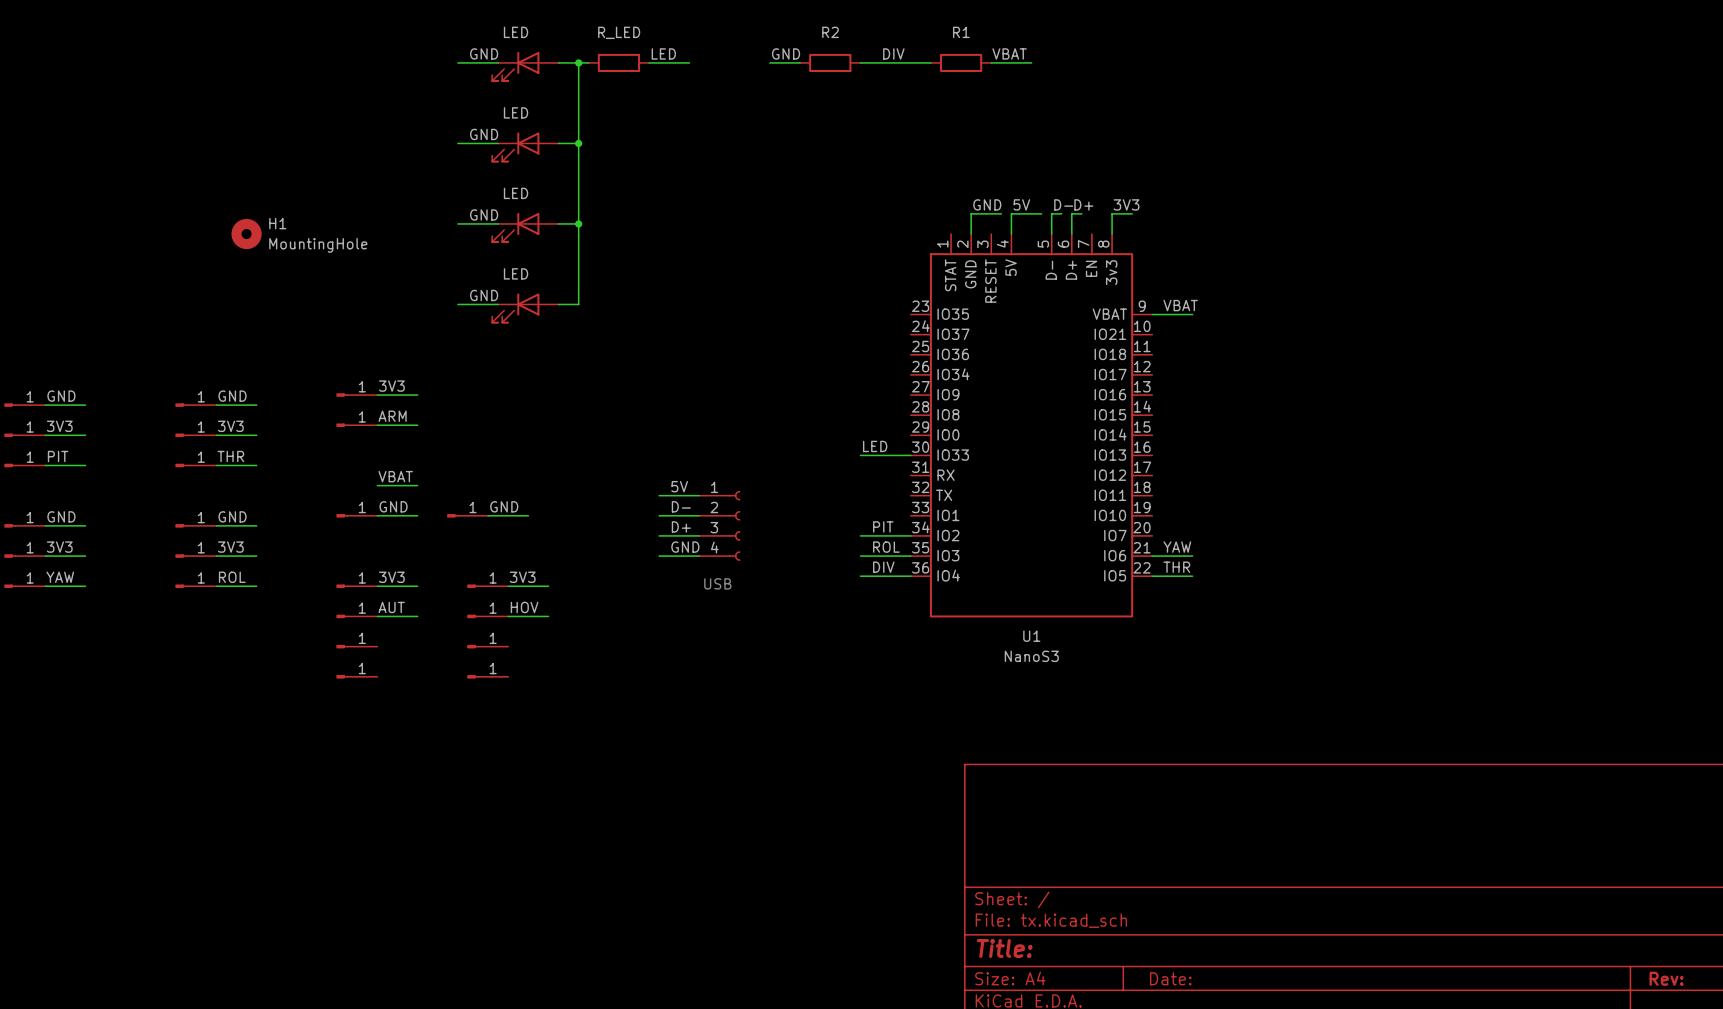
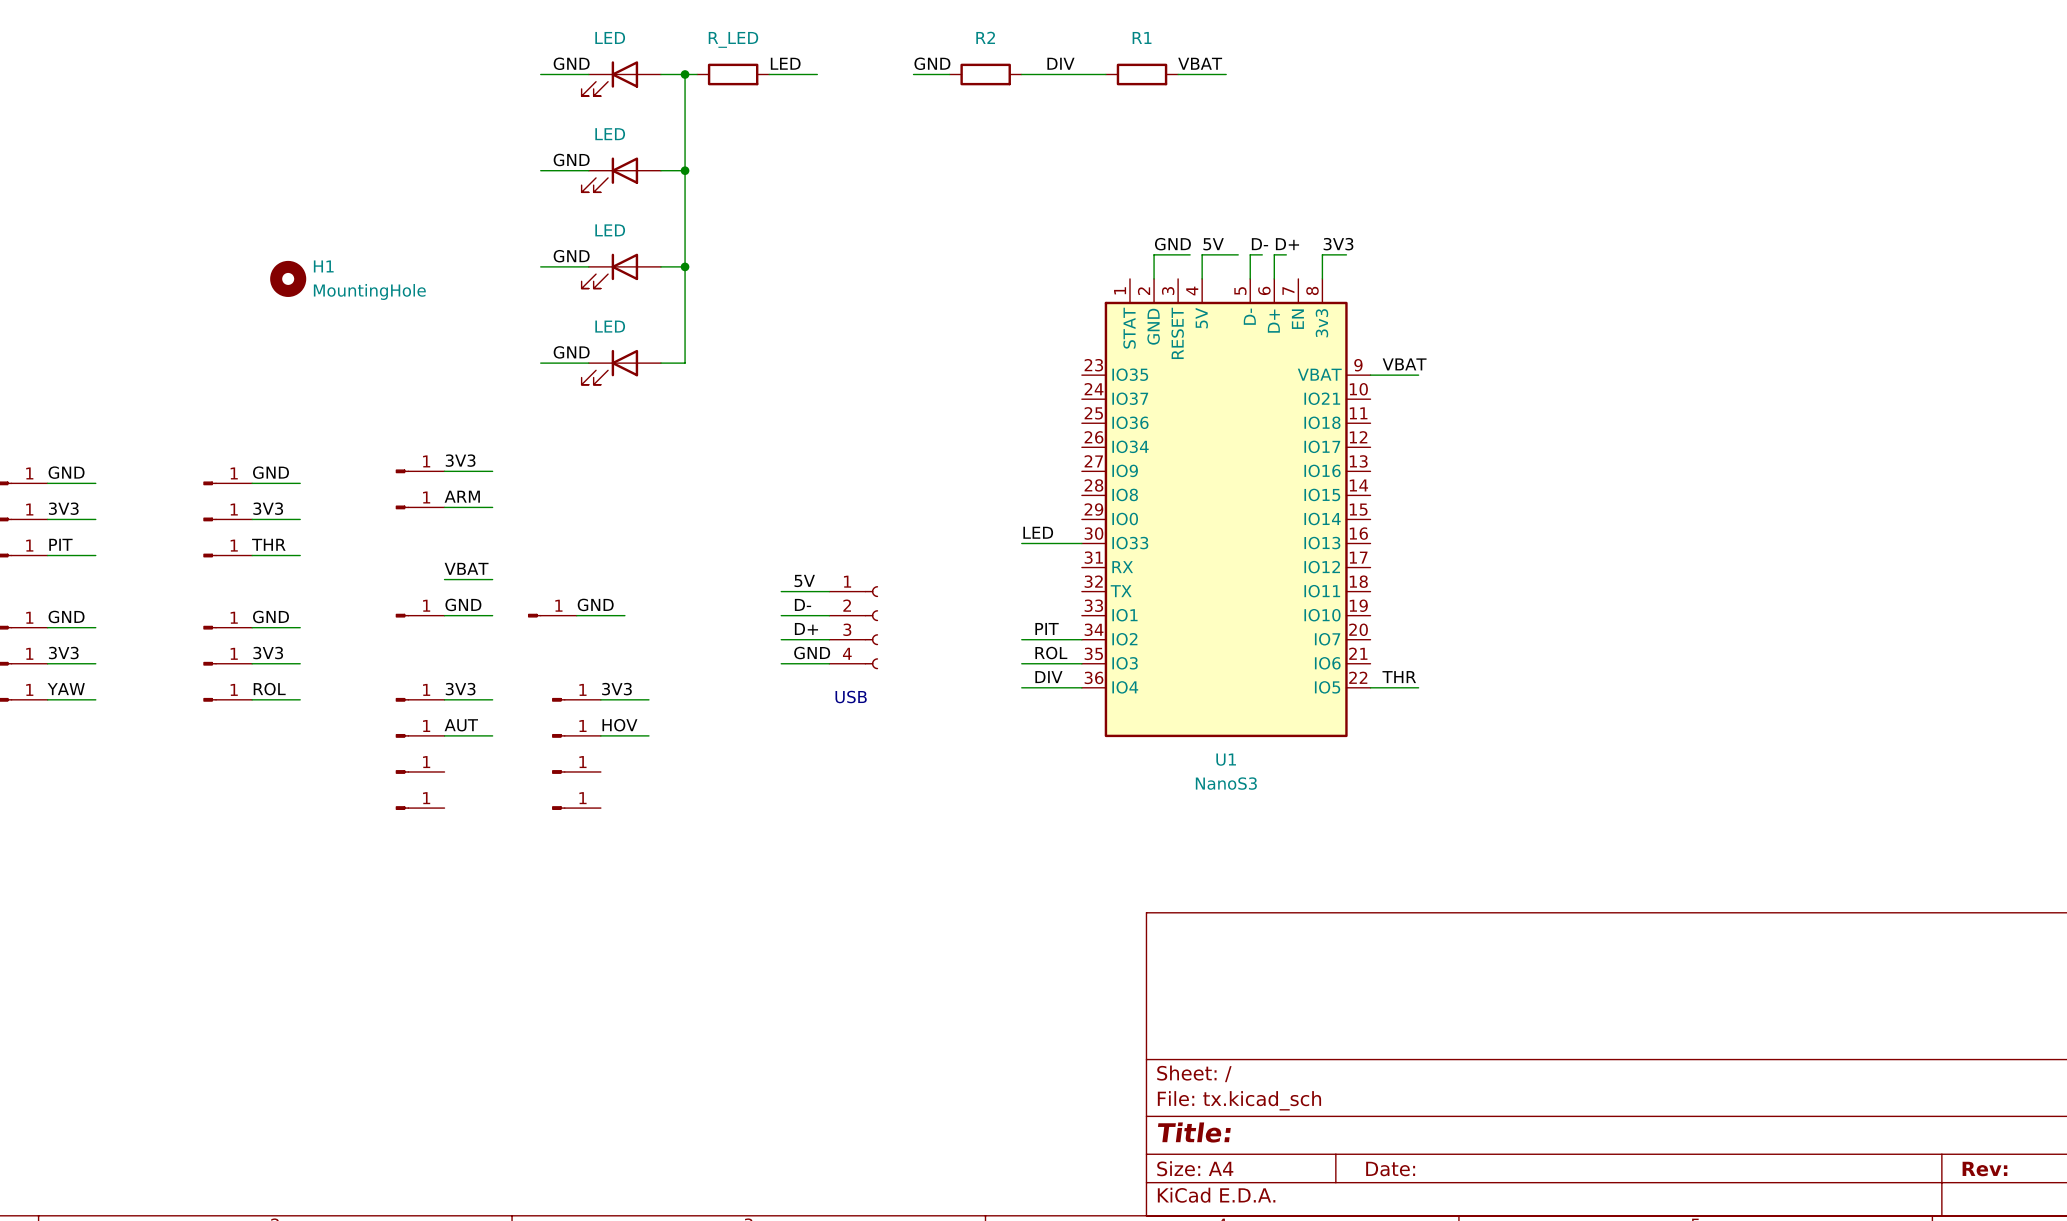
label: YAW (1177, 547) -> none
wire: (1152, 556) (1192, 556) -> none

